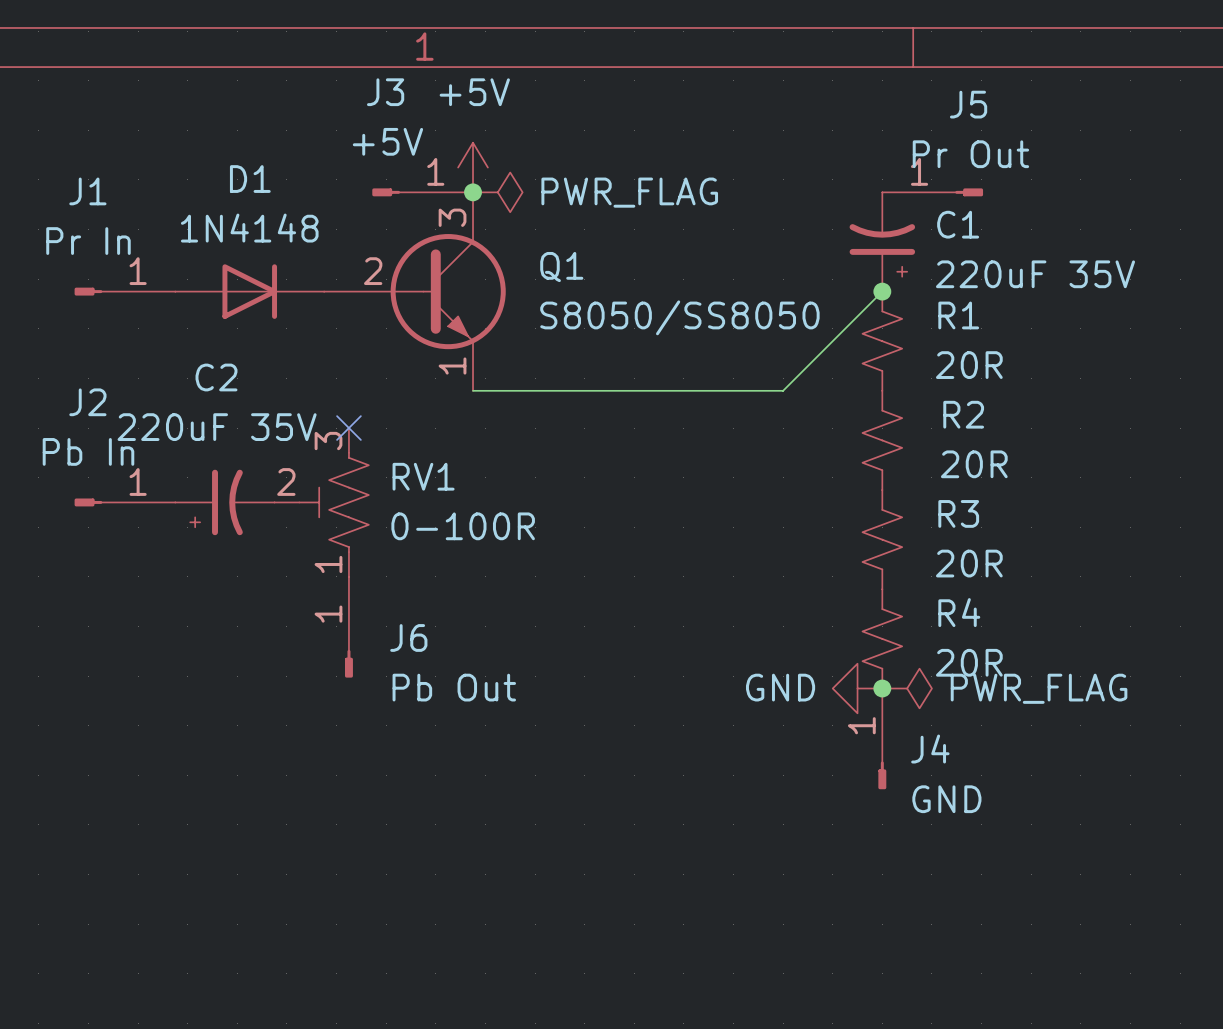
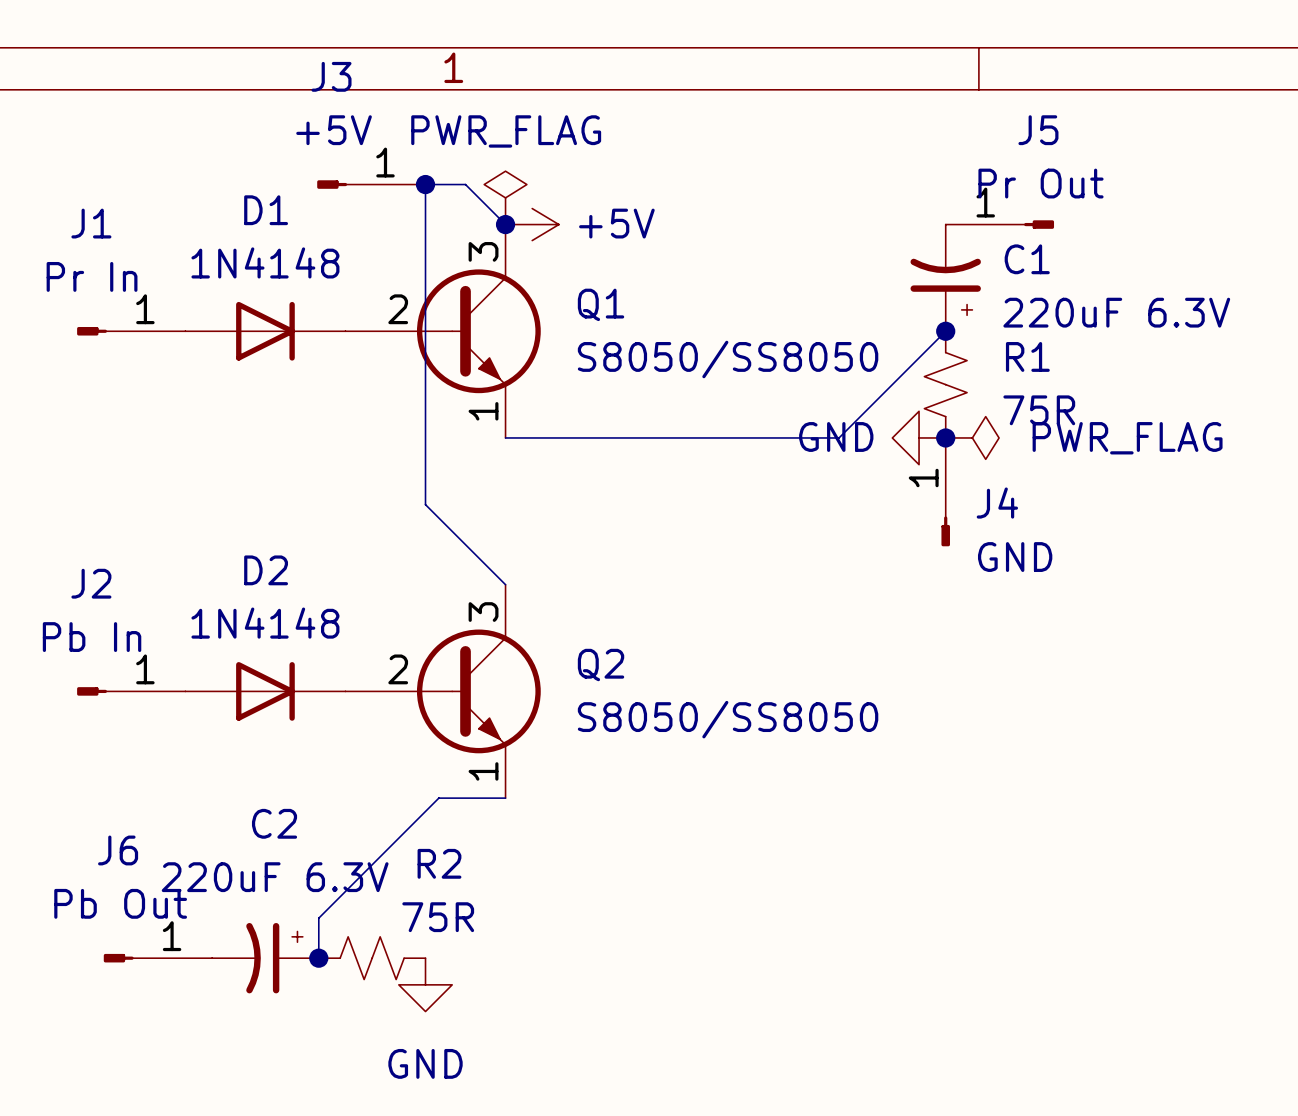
junction: none -> (425, 184)
power symbol: +5V (473, 167) -> PWR_FLAG (505, 197)
J3 position: (422, 192) -> (371, 184)
wire: none -> (505, 224) (465, 184) (425, 184) (425, 504) (505, 584)
power symbol: PWR_FLAG (497, 192) -> +5V (532, 224)
C1 value: 220uF 35V (1035, 274) -> 220uF 6.3V (1116, 312)
R1 value: 20R (969, 365) -> 75R (1039, 410)
power symbol: none -> GND (919, 437)
junction: none -> (945, 437)
R2 name position: R2 (963, 414) -> R2 (439, 863)
C2 value: 220uF 35V (217, 427) -> 220uF 6.3V (275, 877)
no-connect mark: (348, 428) -> none
R2 rotation: 0° (882, 440) -> 90° clockwise (372, 958)
R2 position: (882, 440) -> (372, 958)
R2 value: 20R (974, 464) -> 75R (438, 917)
J2 position: (124, 502) -> (131, 691)
C2 rotation: 0° (216, 502) -> 180° (274, 958)
C2 position: (224, 502) -> (265, 958)
RV1: 0-100R (321, 502) -> none
R3: 20R (882, 539) -> none
D2: none -> 1N4148 (265, 691)
Q2: none -> S8050/SS8050 (443, 691)
J6 position: (348, 627) -> (157, 958)
J6 name position: J6 (408, 637) -> J6 (118, 850)
R4: 20R (882, 638) -> none
J6 rotation: 0° (348, 663) -> 90° clockwise (118, 958)
J6 value position: Pb Out (454, 687) -> Pb Out (120, 903)
power symbol: GND (857, 688) -> none
junction: (882, 688) -> none
power symbol position: PWR_FLAG (907, 688) -> PWR_FLAG (972, 437)
power symbol text position: PWR_FLAG (1039, 688) -> PWR_FLAG (1127, 438)
wire: none -> (505, 798) (438, 798) (318, 918) (318, 958)
J4 position: (882, 738) -> (945, 492)
junction: none -> (318, 958)
power symbol: none -> GND (425, 984)

